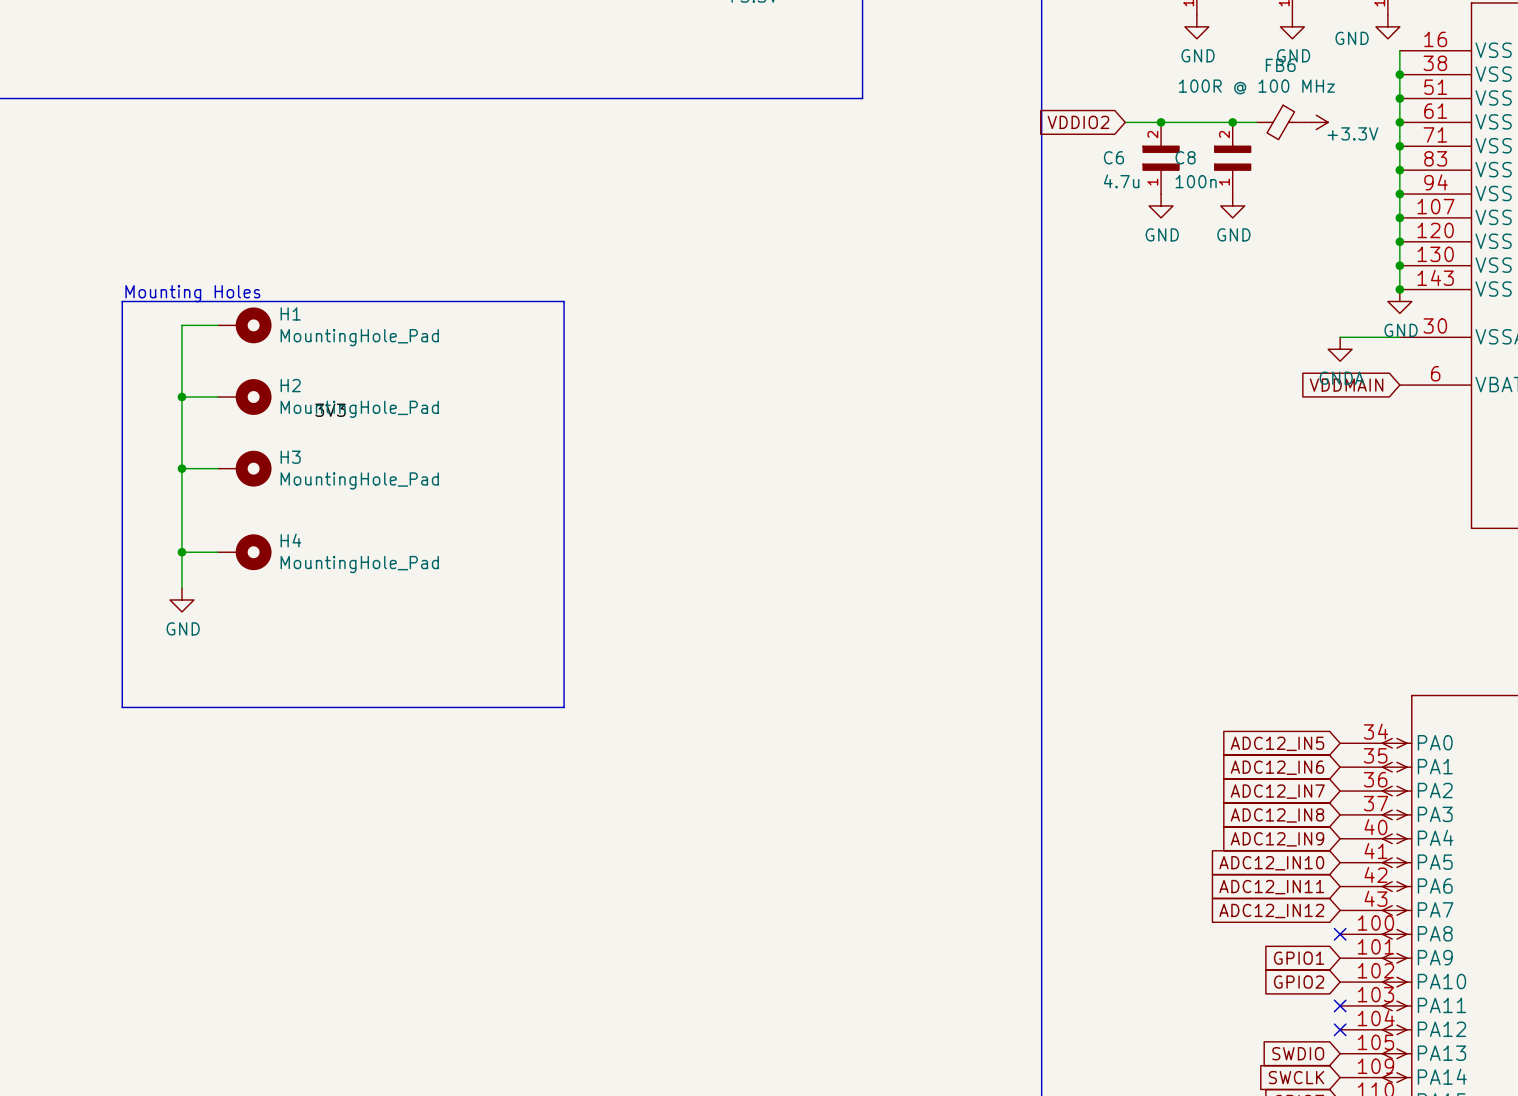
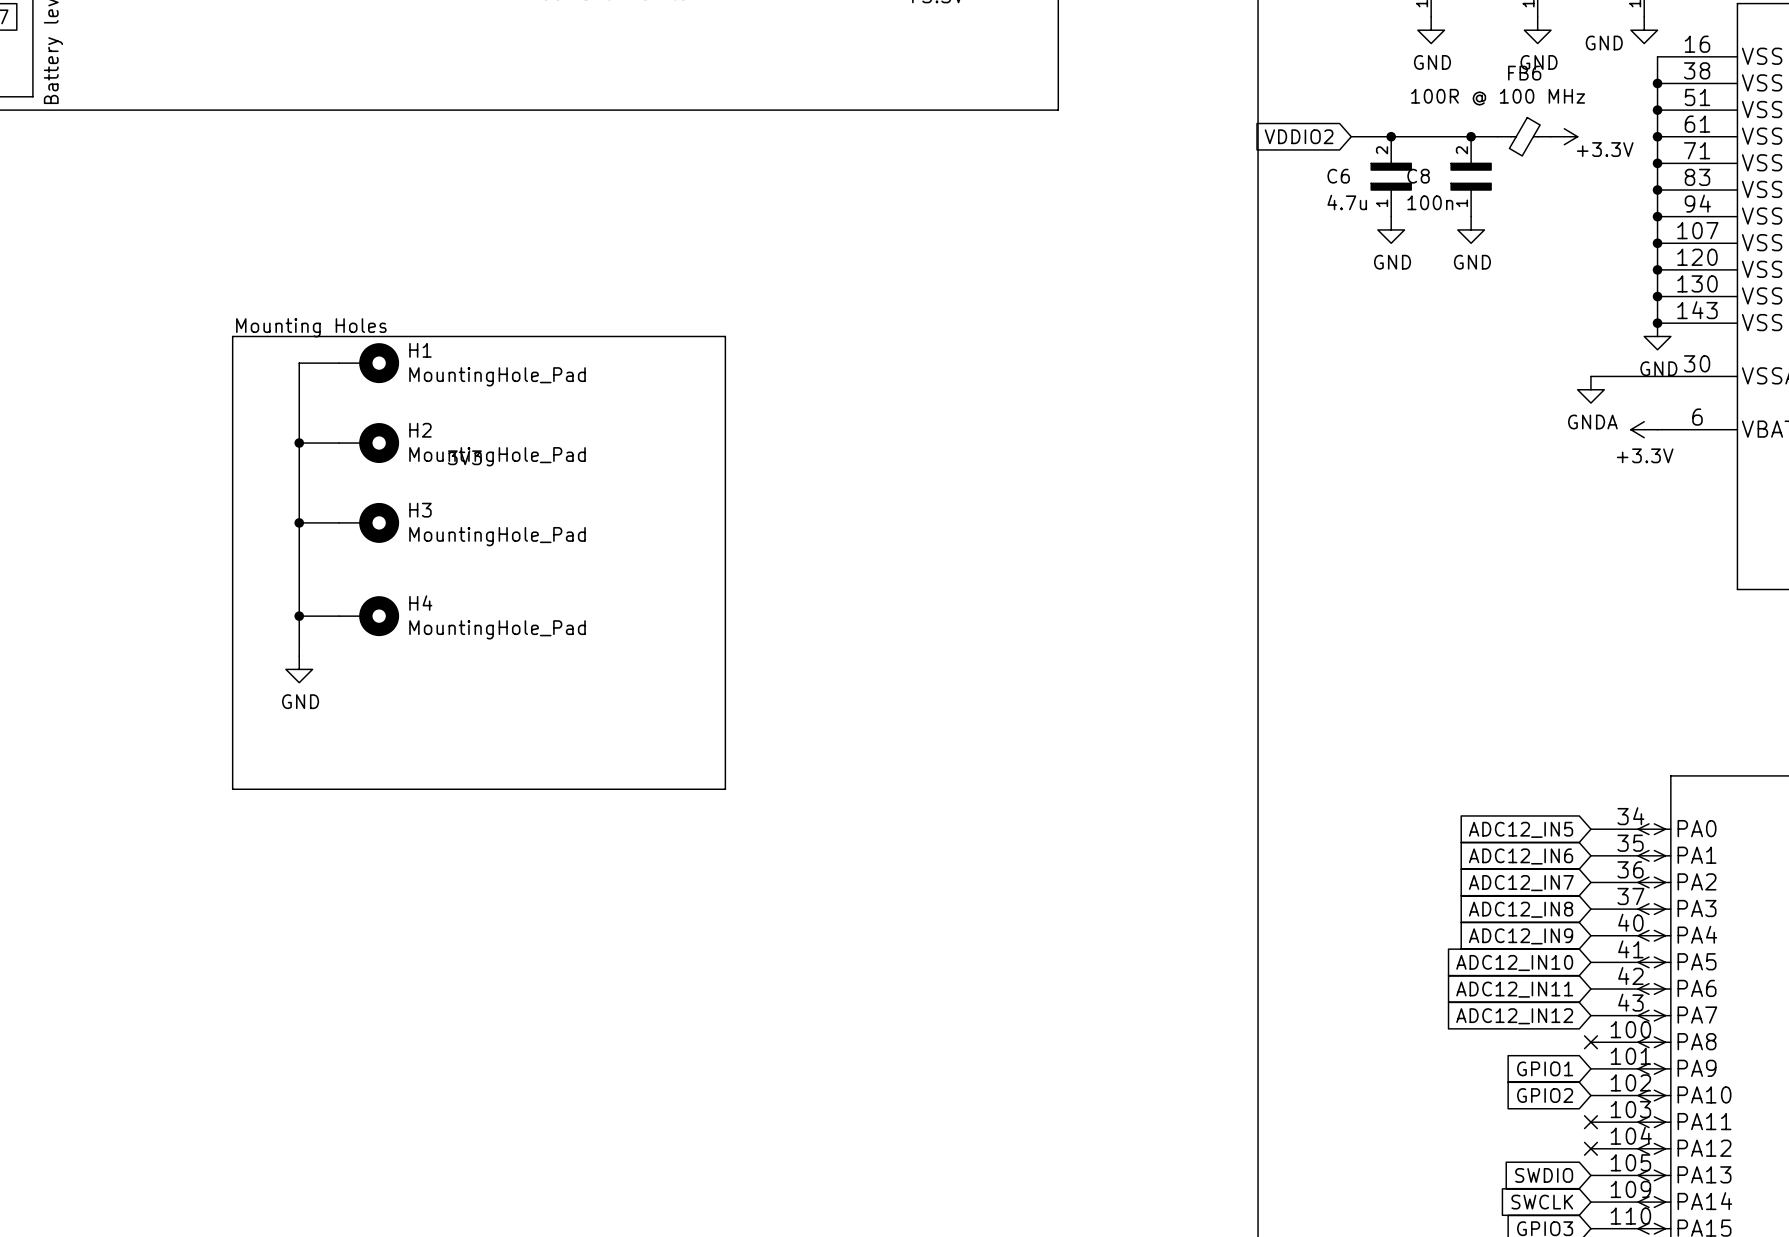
global label: VDDMAIN (1346, 385) -> none
power symbol: none -> +3.3V (1644, 429)

